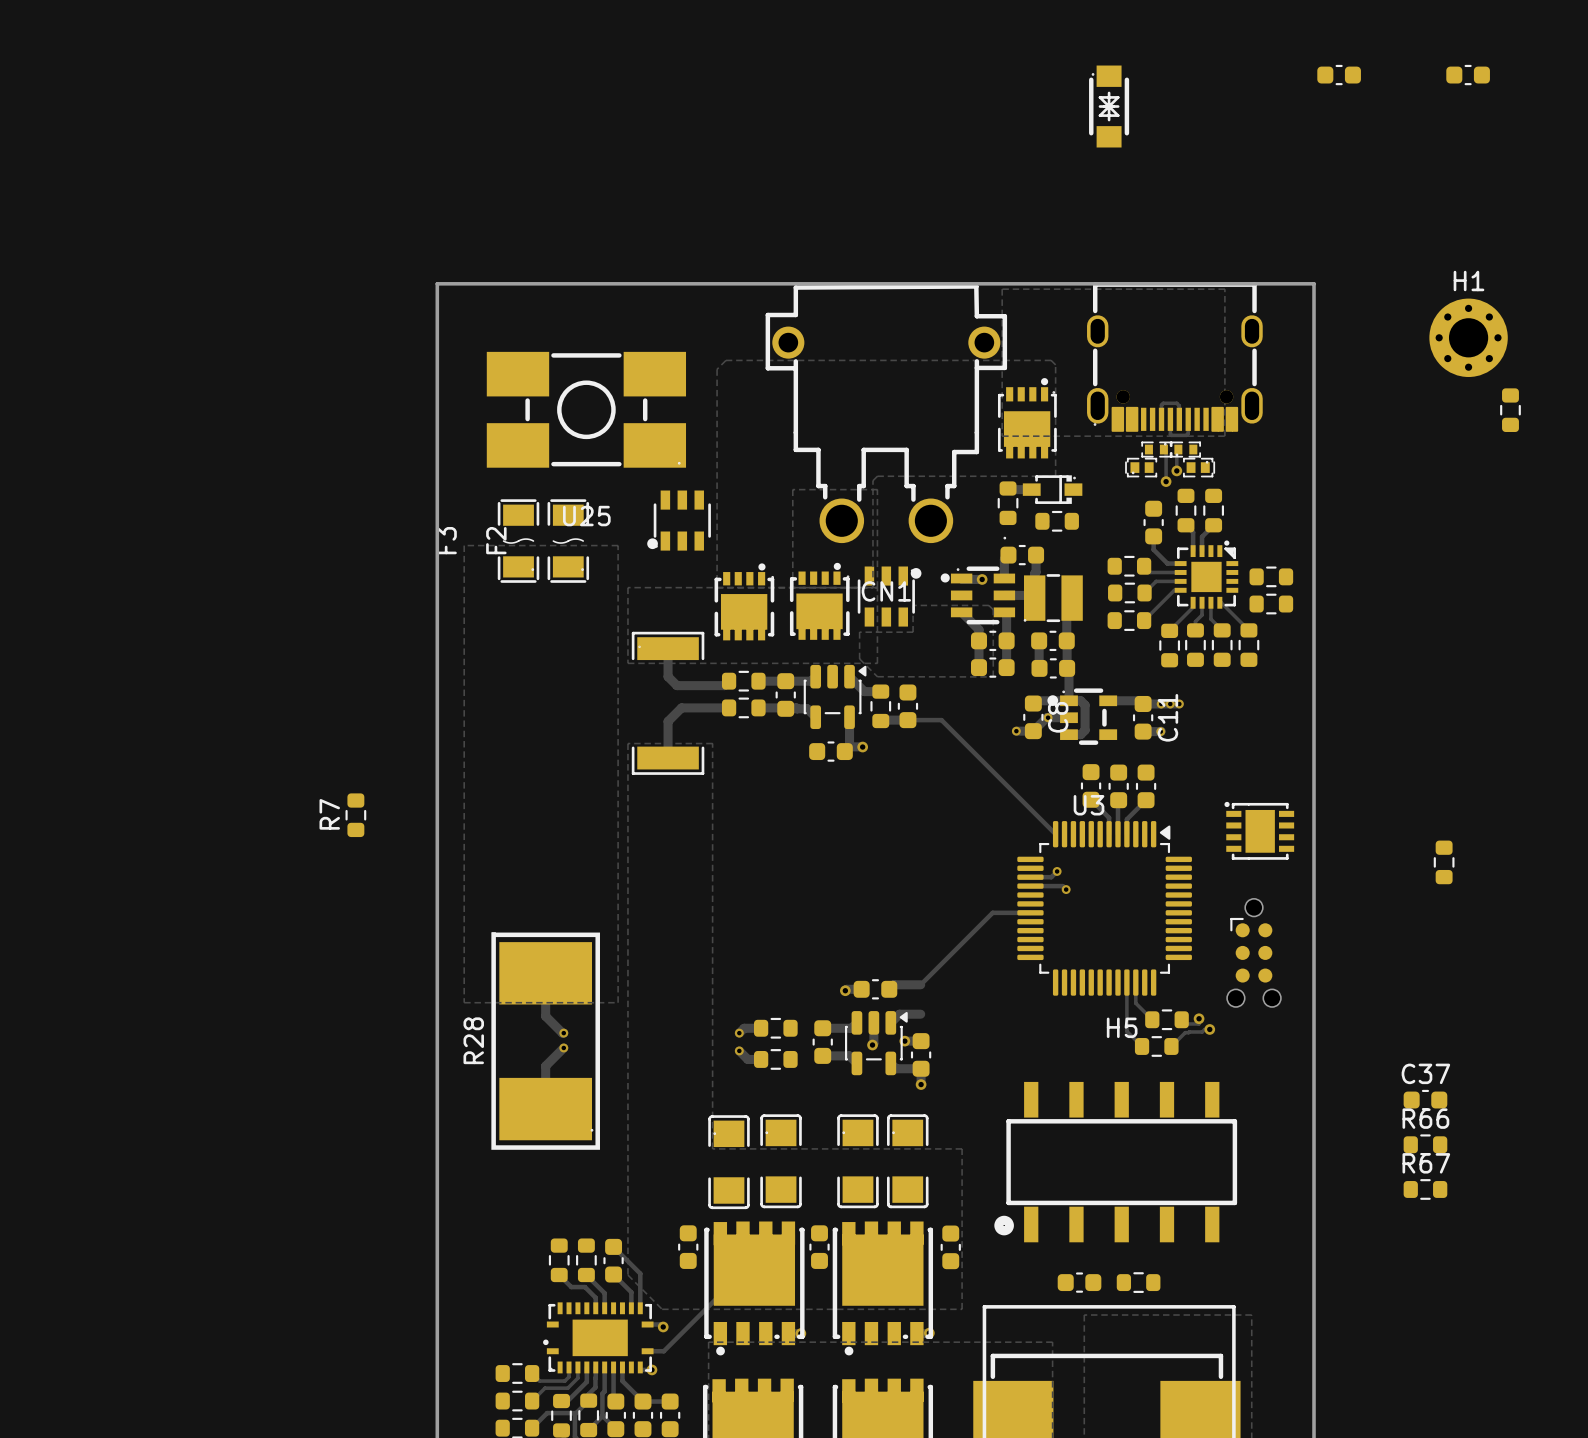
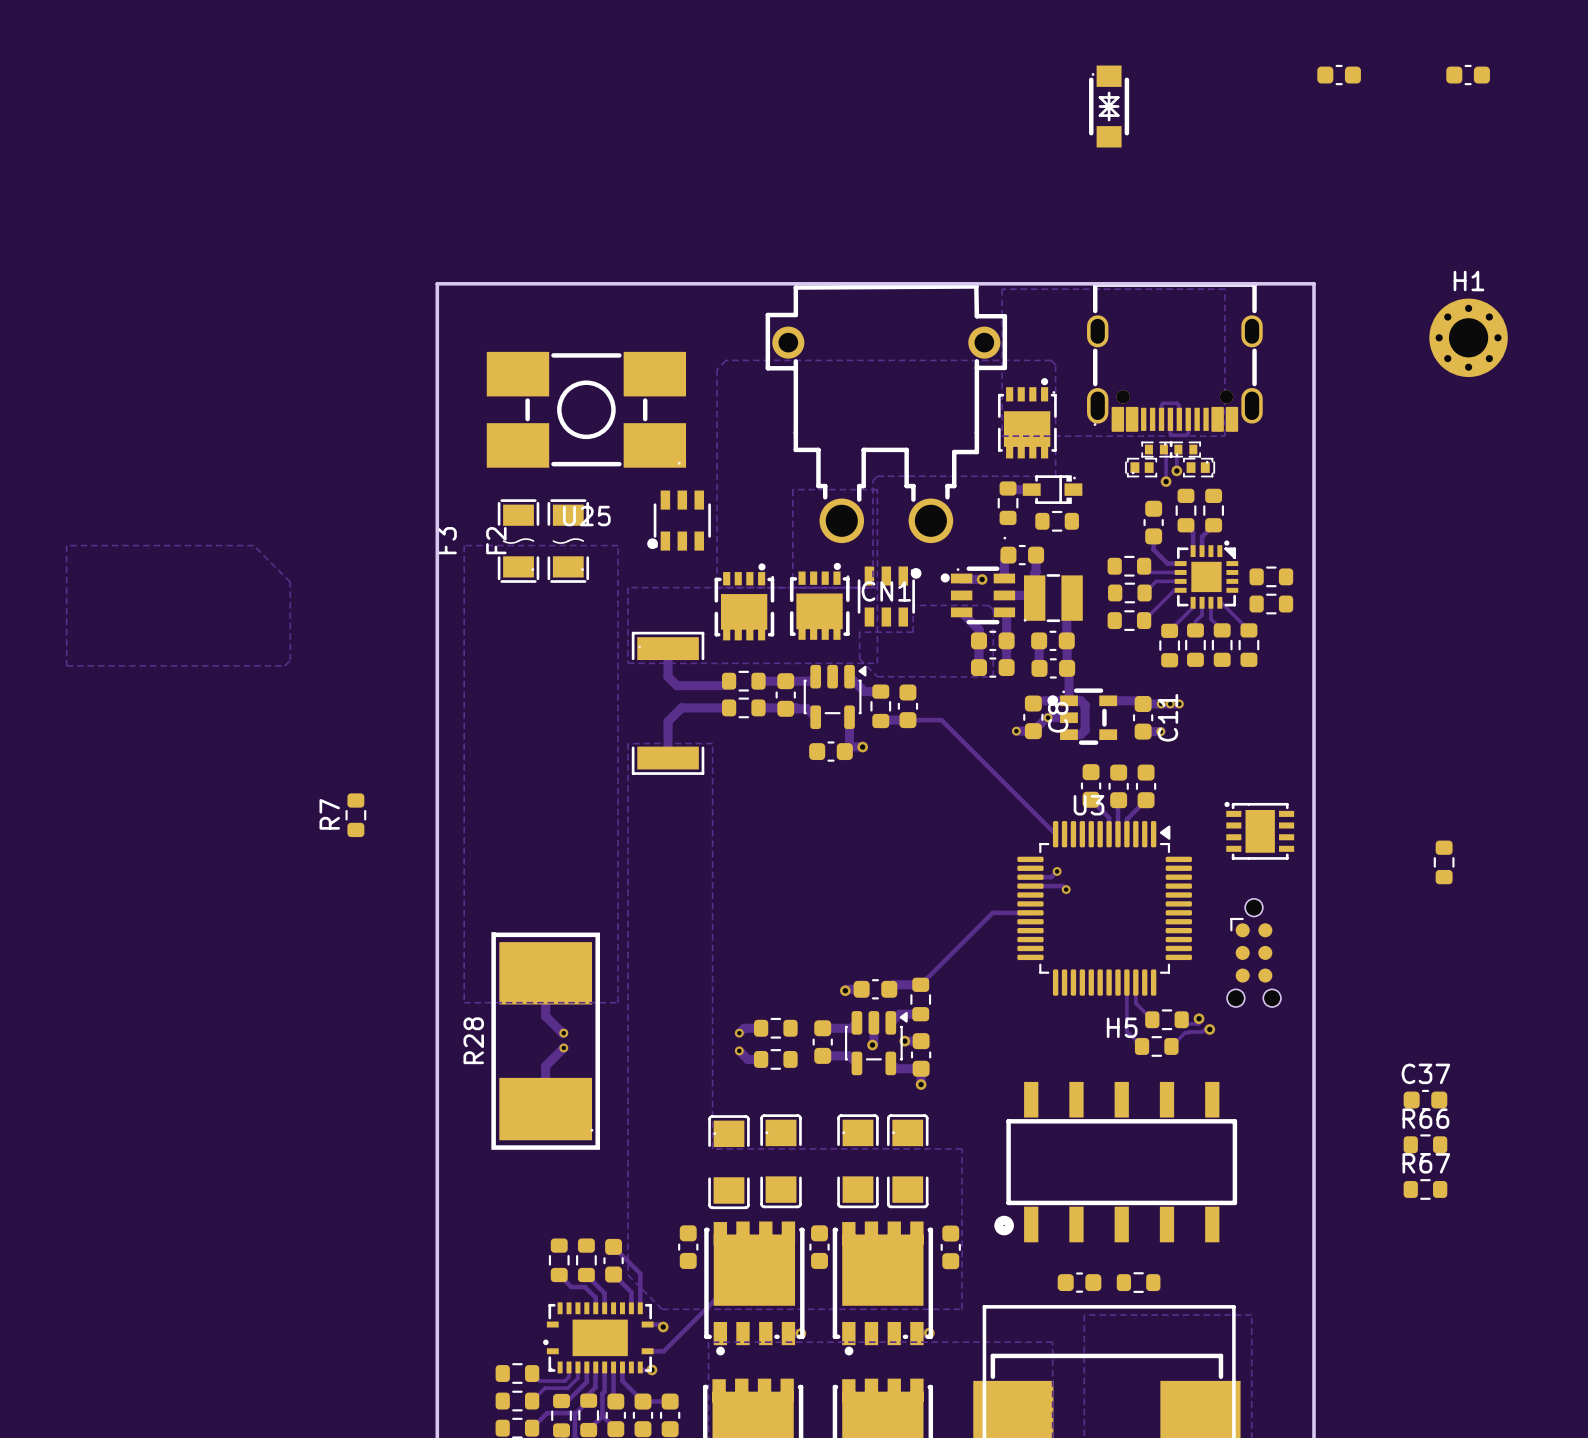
part: (1510, 410) -> none
zone outline: none -> (66, 545) (66, 665) (284, 665) (290, 660) (290, 582) (253, 545) (66, 545)
part: none -> (920, 999)

